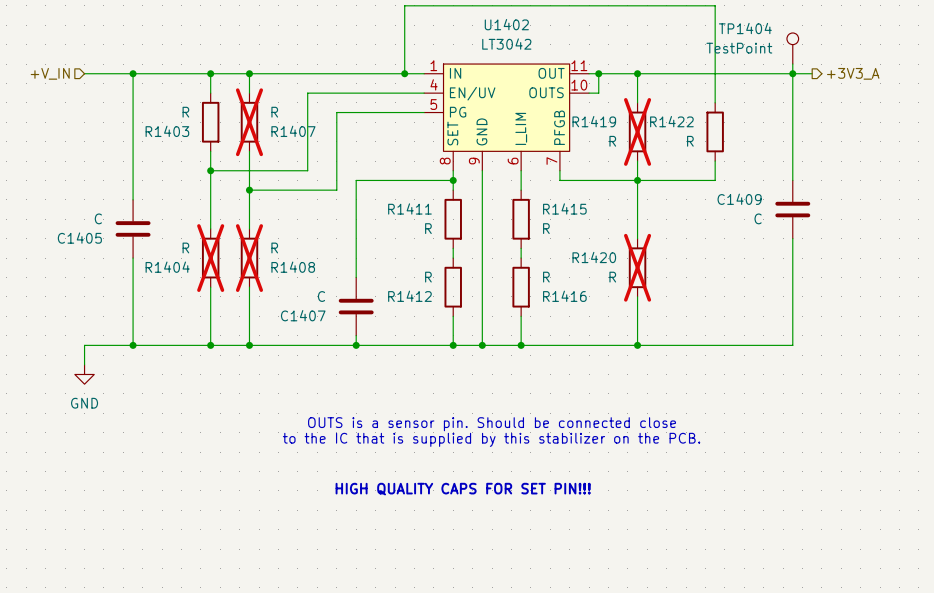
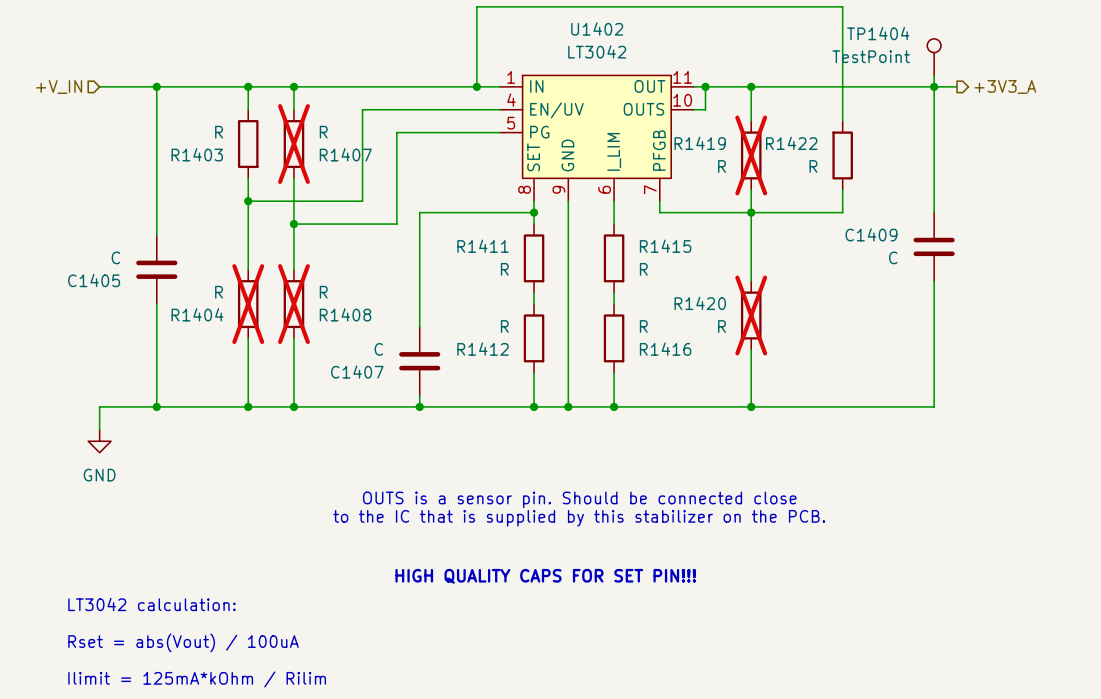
text: none -> LT3042 calculation: (151, 604)
text: none -> Rset = abs(Vout) / 100uA (183, 642)
text: none -> Ilimit = 125mA*kOhm / Rilim (197, 679)

